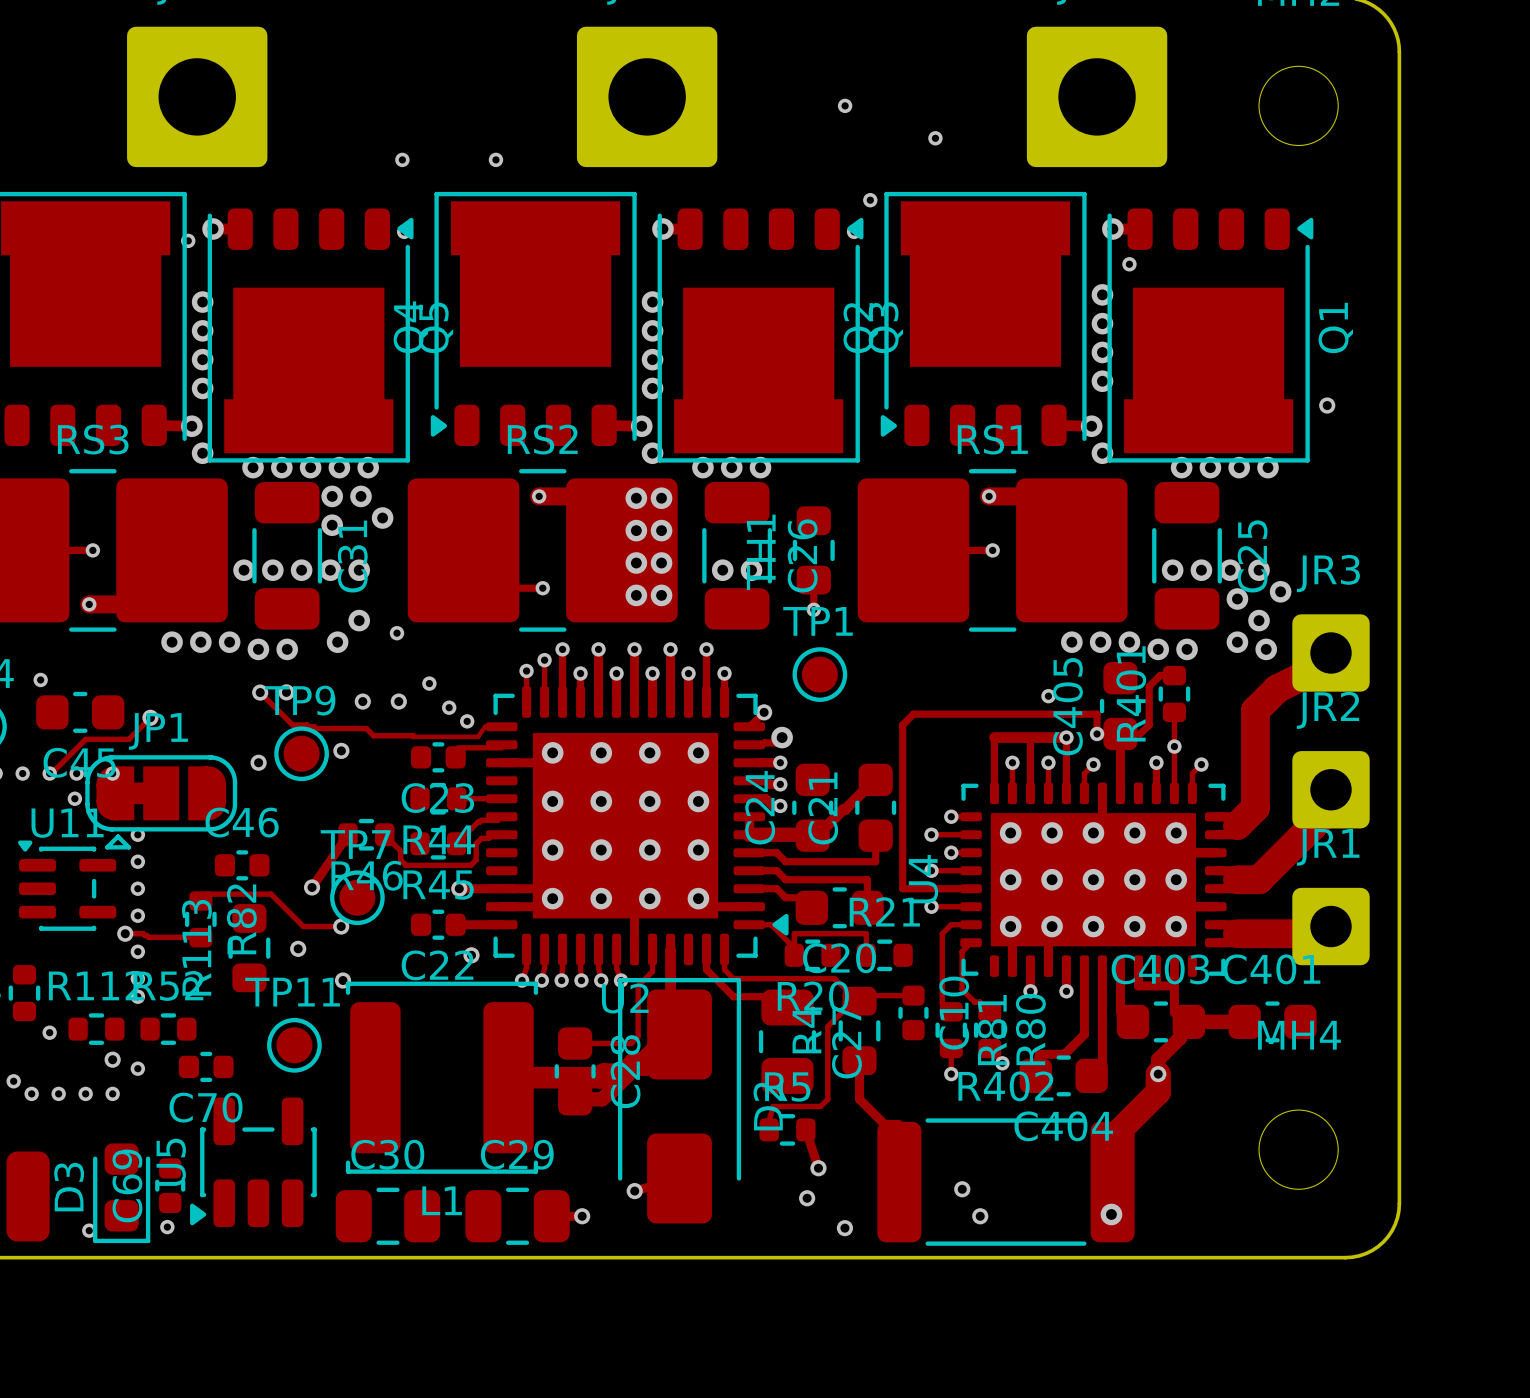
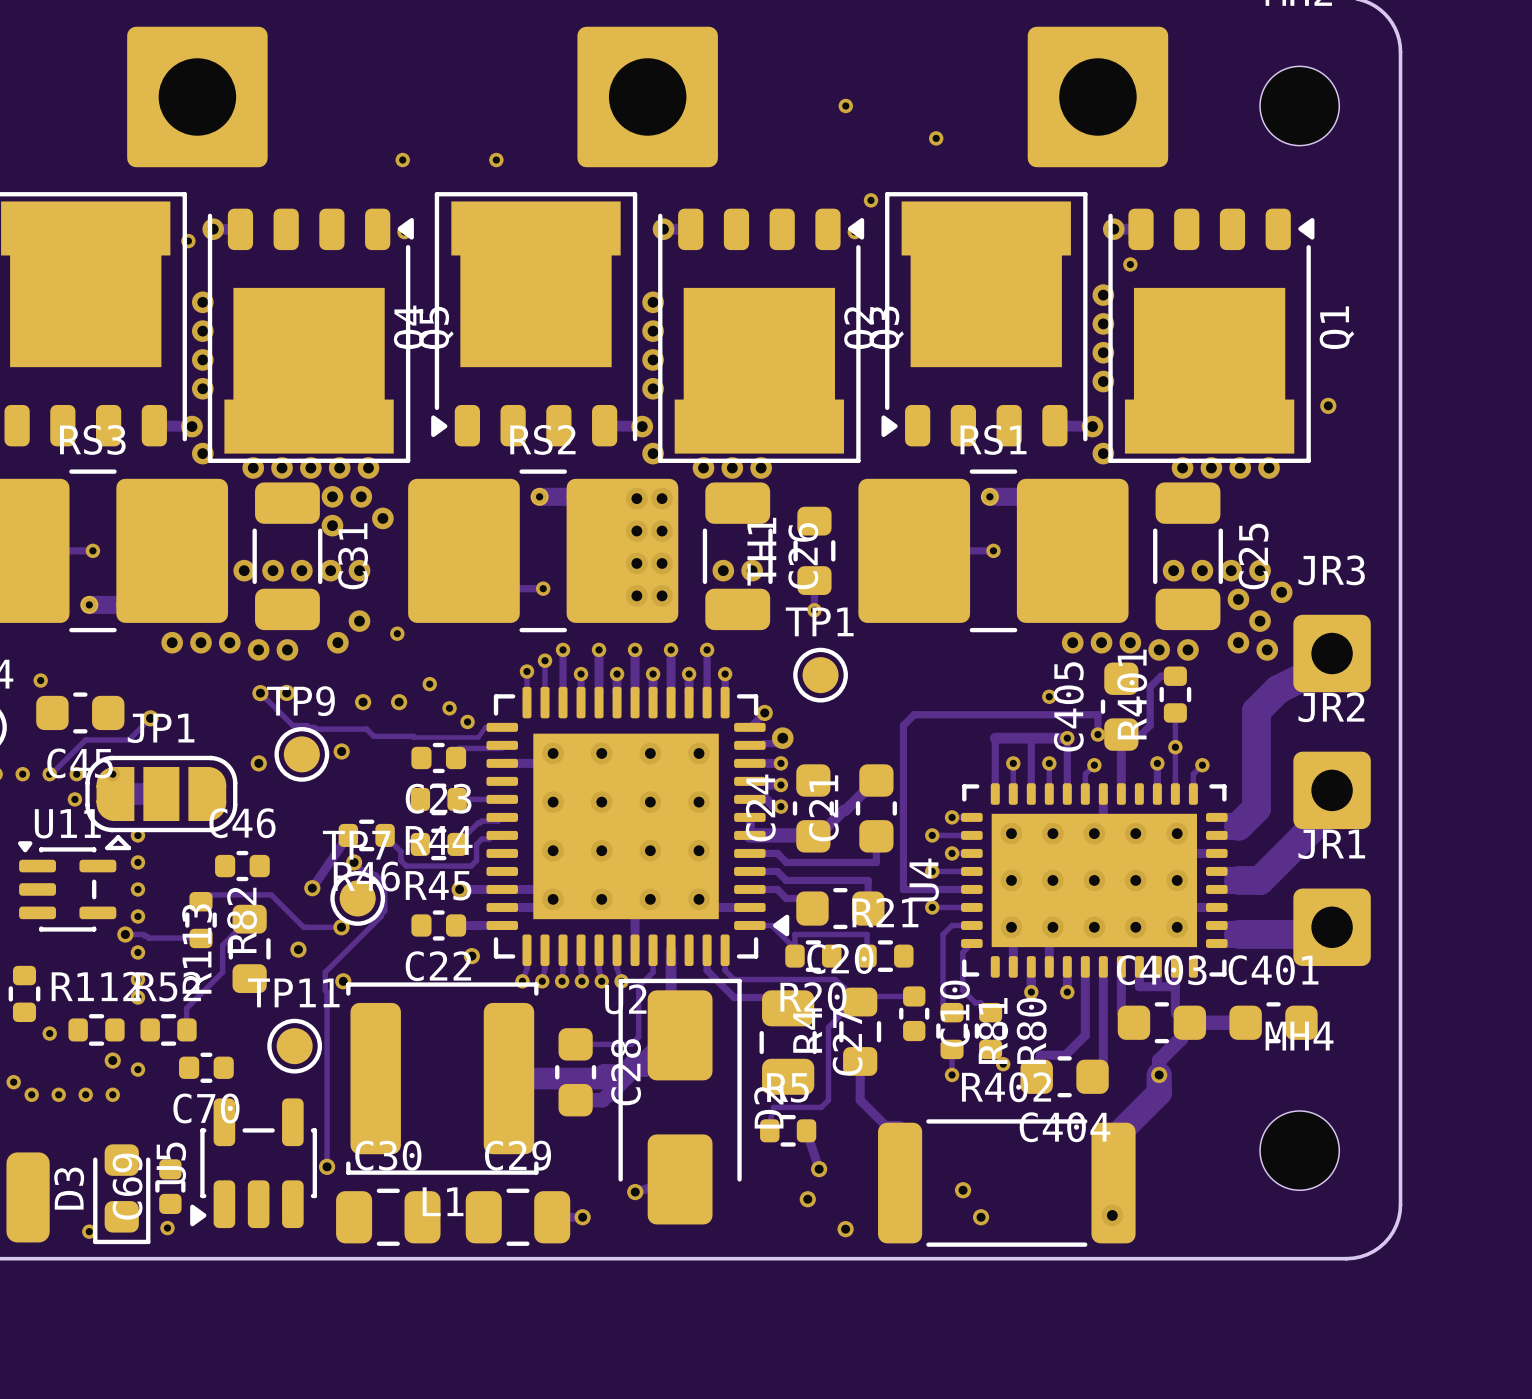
track: none -> (354, 862) (361, 869) (375, 875) (384, 885) (384, 911) (325, 972) (325, 990) (327, 992) (327, 1166)
via: none -> (354, 862)
track: none -> (249, 919) (222, 945) (222, 972) (186, 1008) (186, 1029)
via: none -> (327, 1166)

